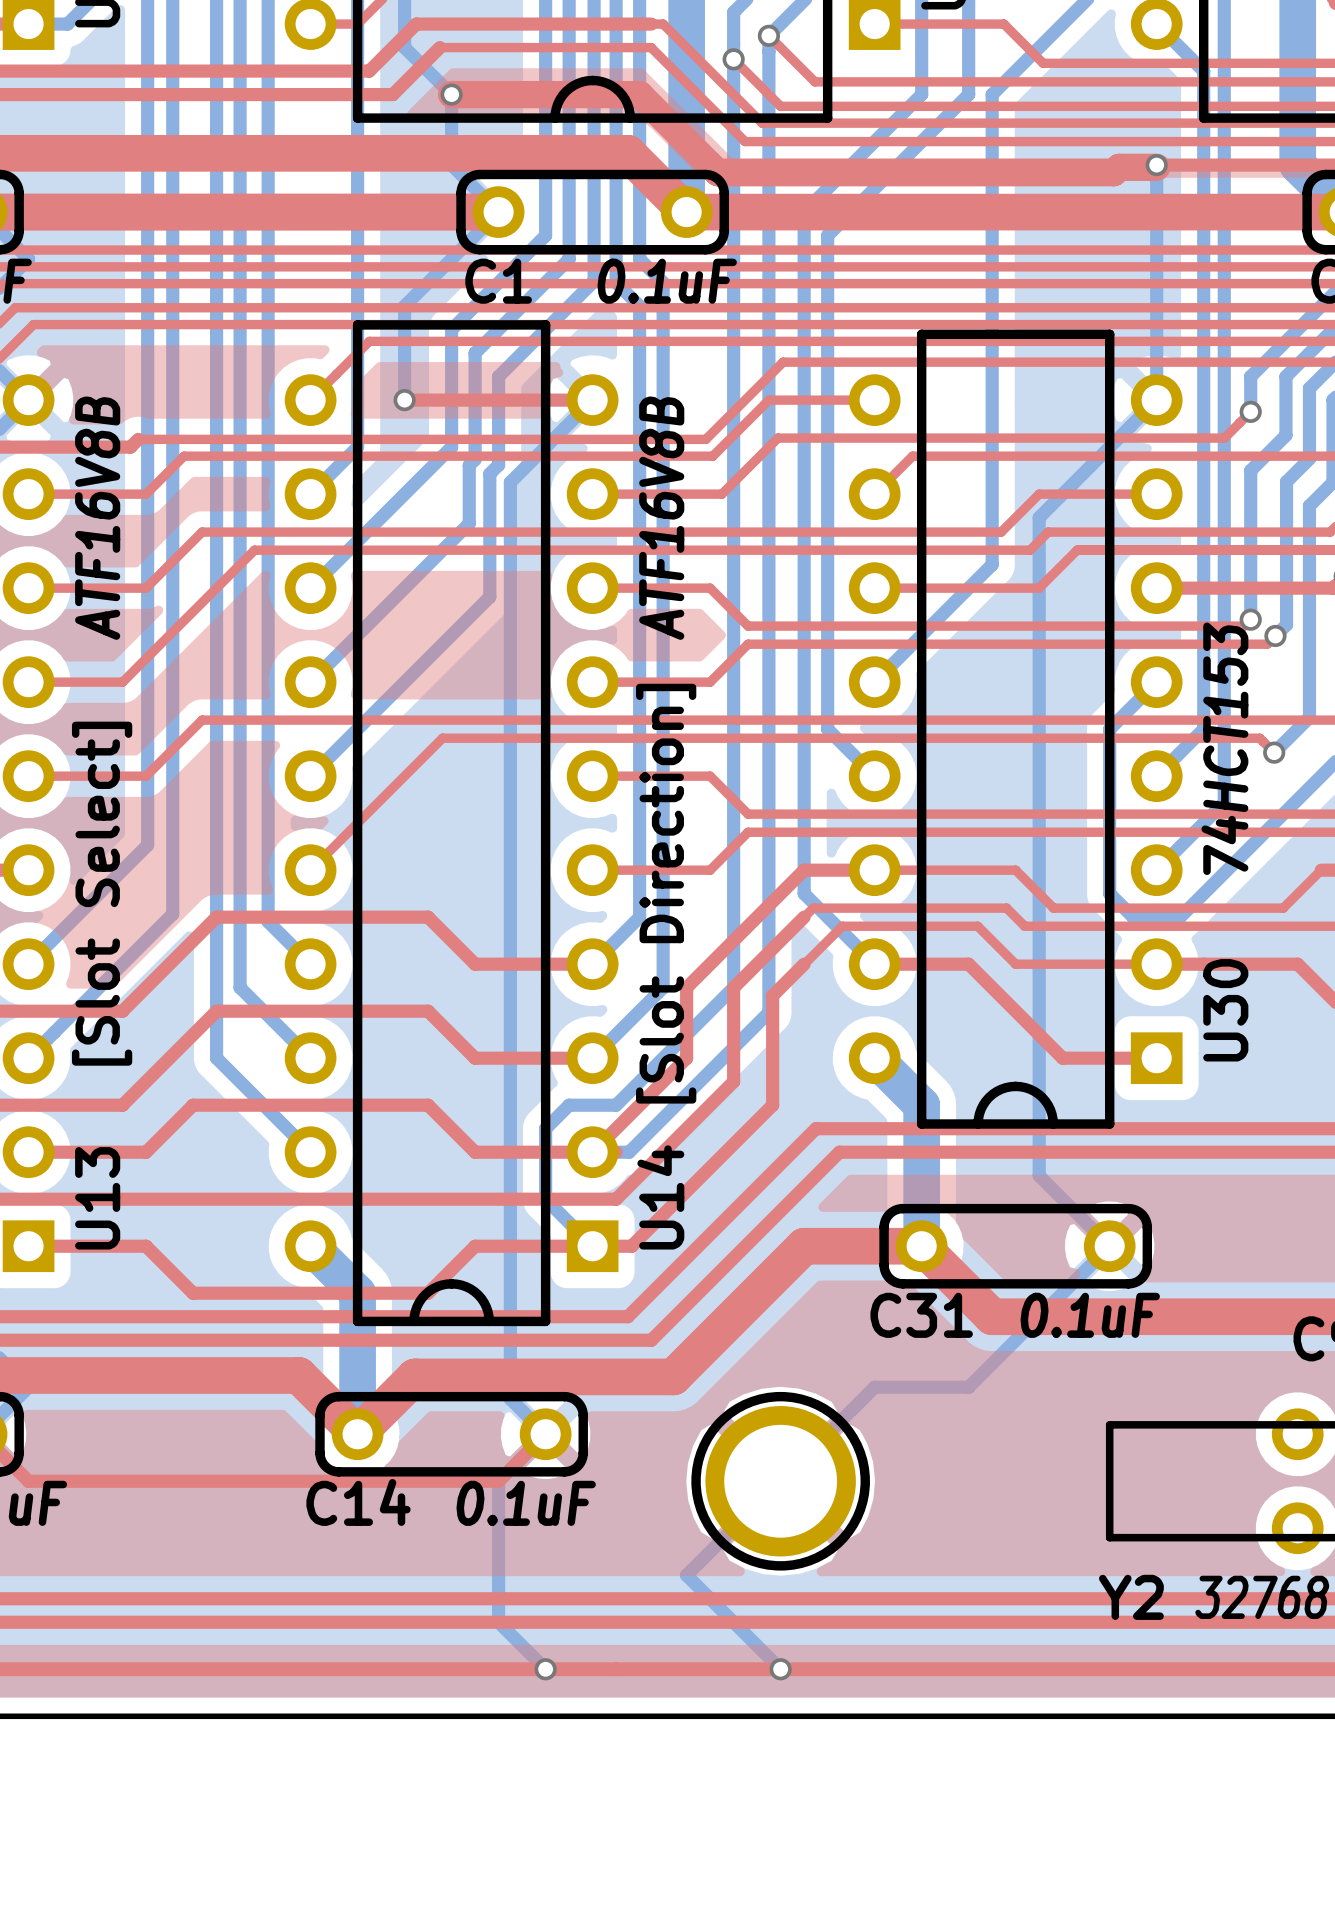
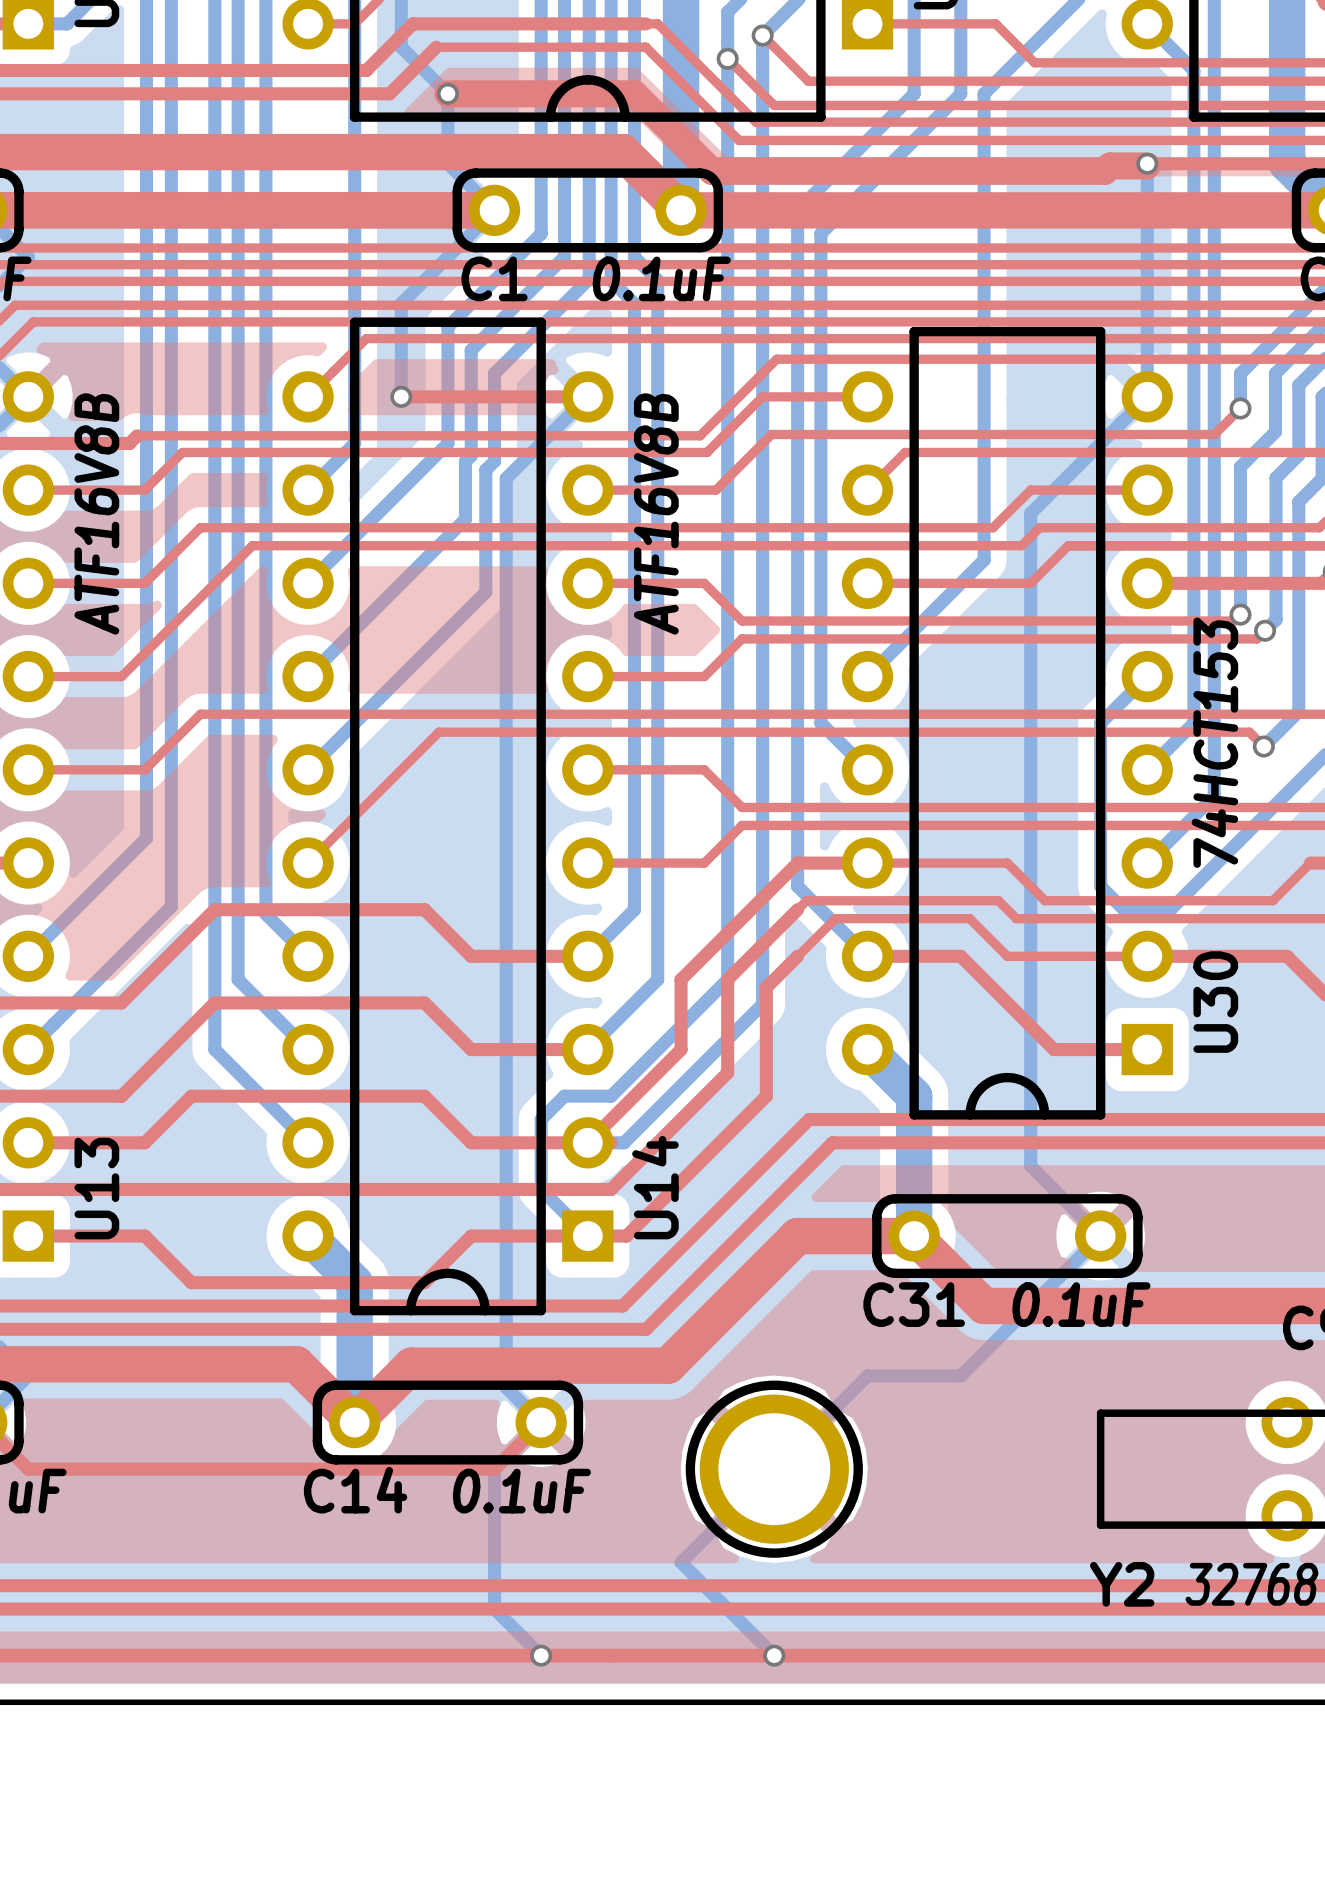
text: [Slot Select] (102, 893) -> none
text: [Slot Direction] (666, 893) -> none

